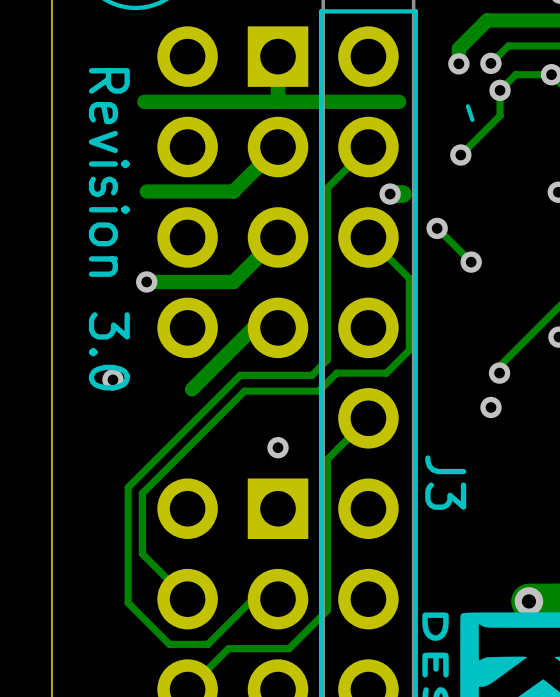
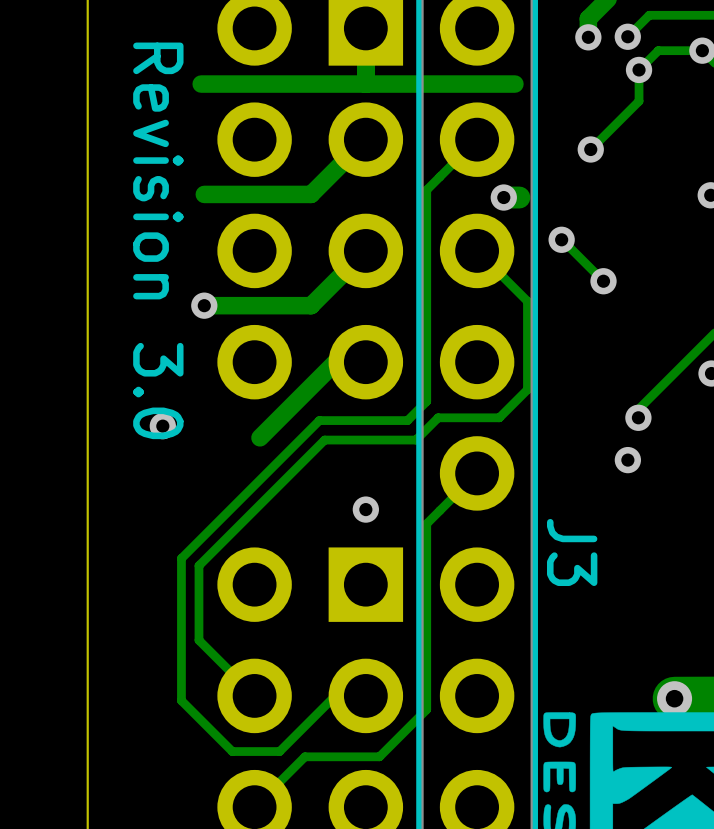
line: (467, 106) (472, 119) -> none

